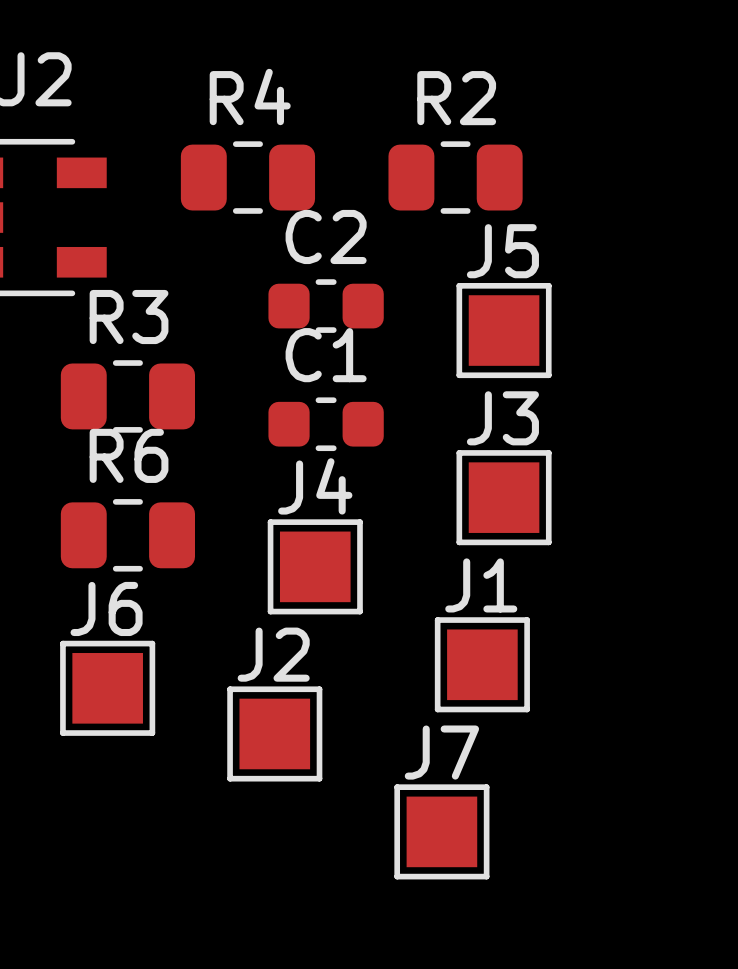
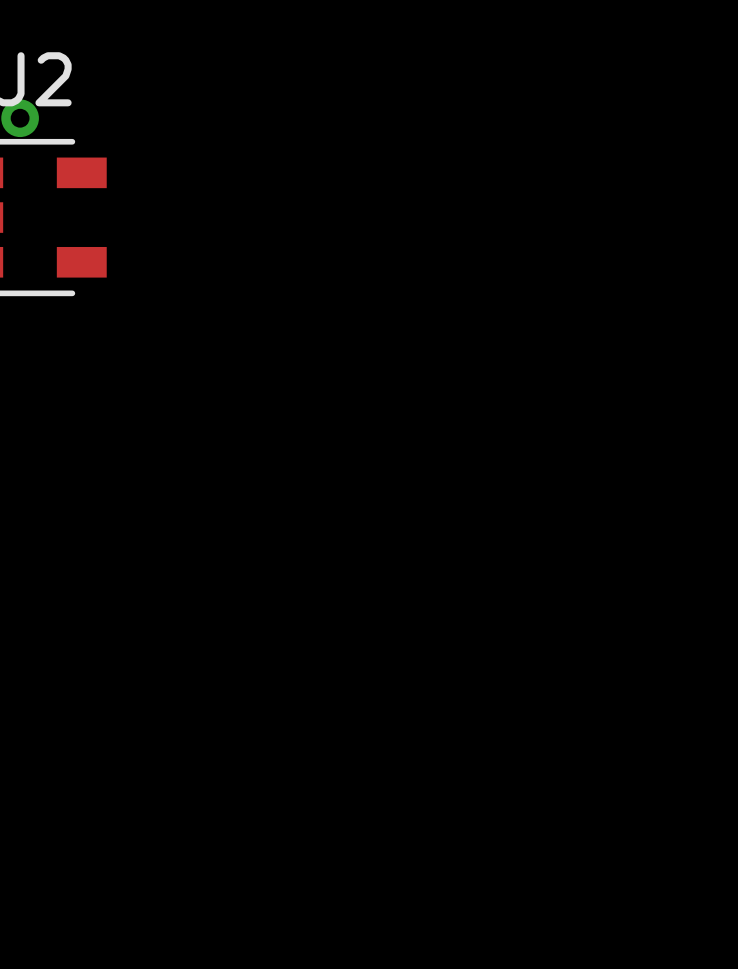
via: none -> (20, 118)
R4: (247, 177) -> none
R2: (455, 177) -> none
C2: (326, 306) -> none
J5: (504, 330) -> none
R3: (127, 396) -> none
C1: (326, 424) -> none
J3: (504, 497) -> none
R6: (127, 535) -> none
J4: (315, 566) -> none
J1: (482, 664) -> none
J6: (107, 688) -> none
J2: (274, 733) -> none
J7: (441, 831) -> none

